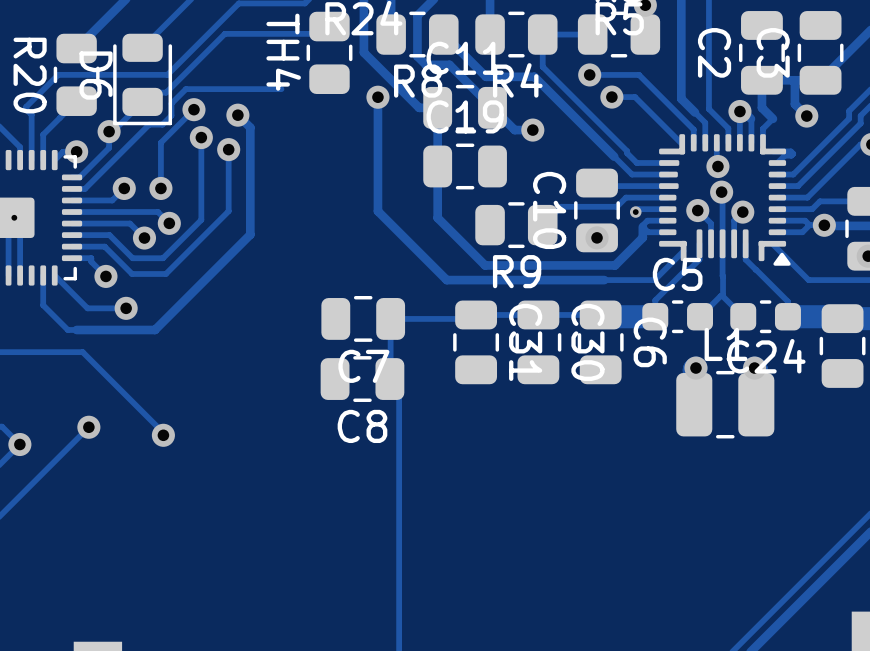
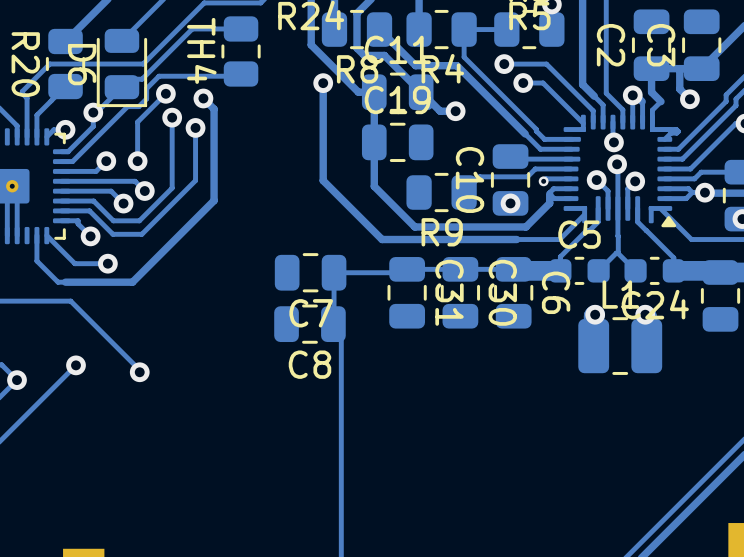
track: (329, 26) (322, 33) (281, 33) -> none
TH4 position: (329, 52) -> (241, 51)

